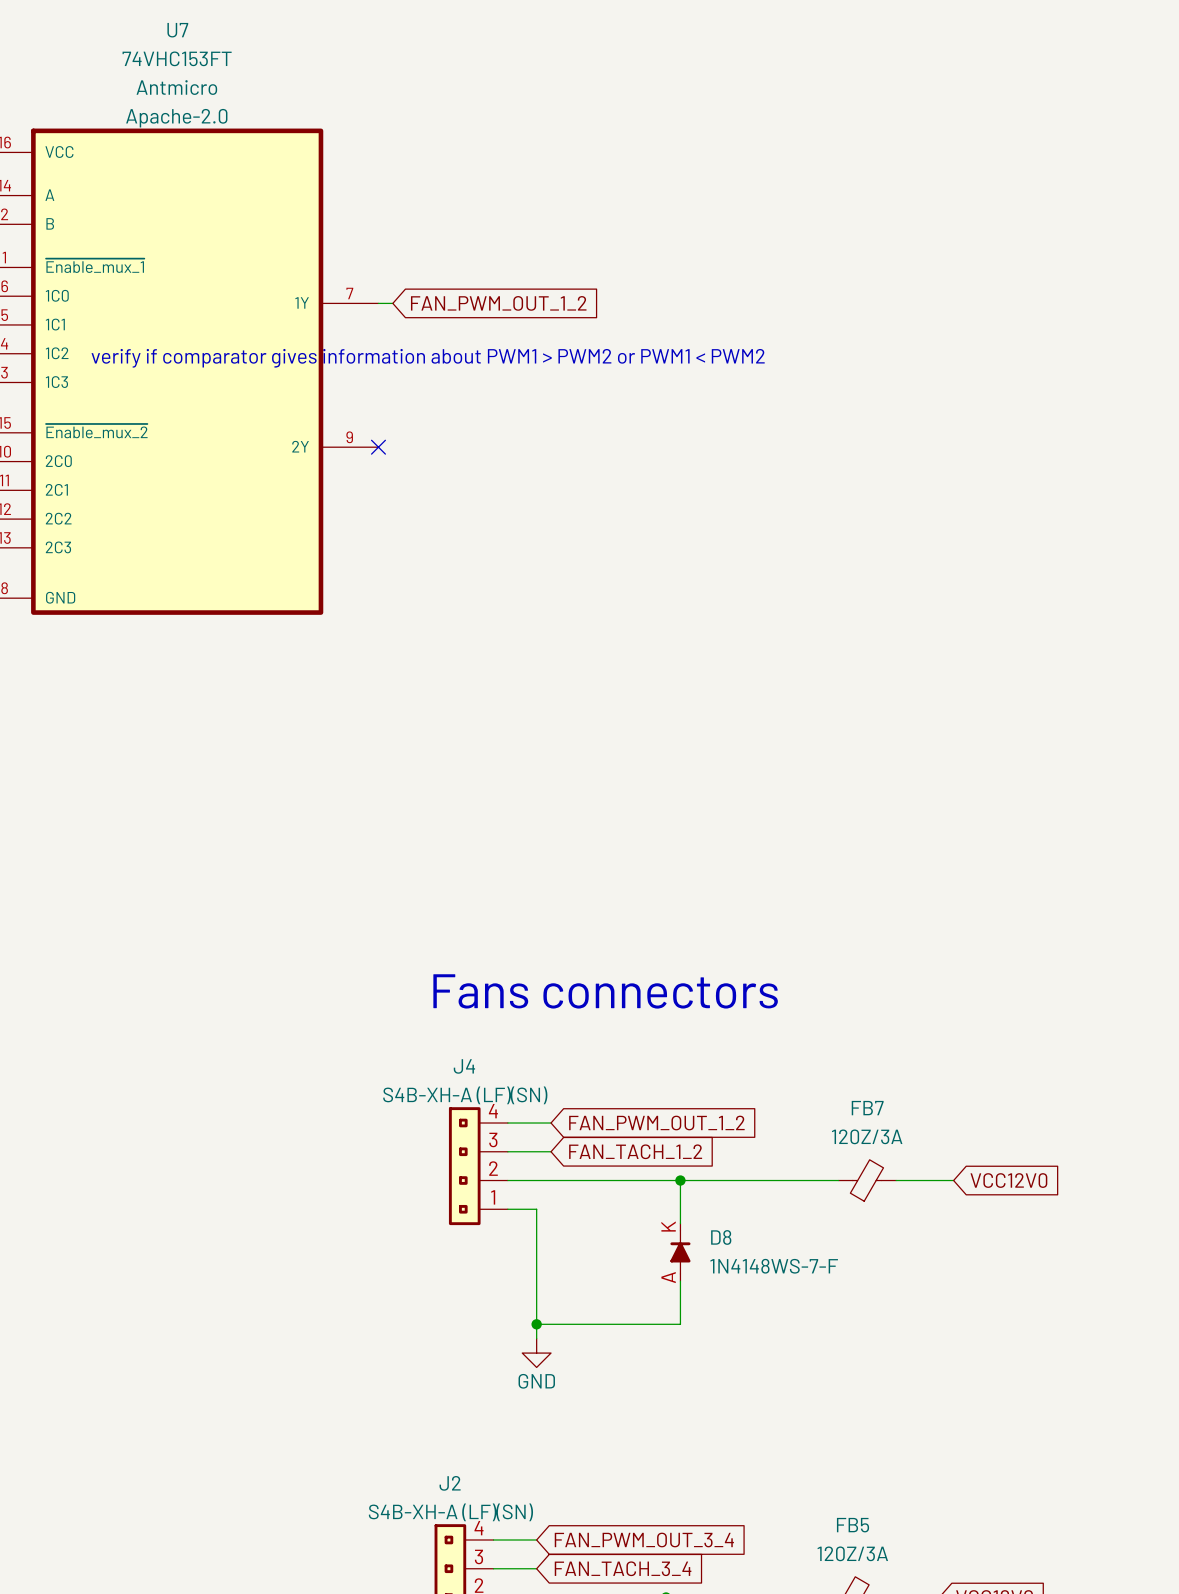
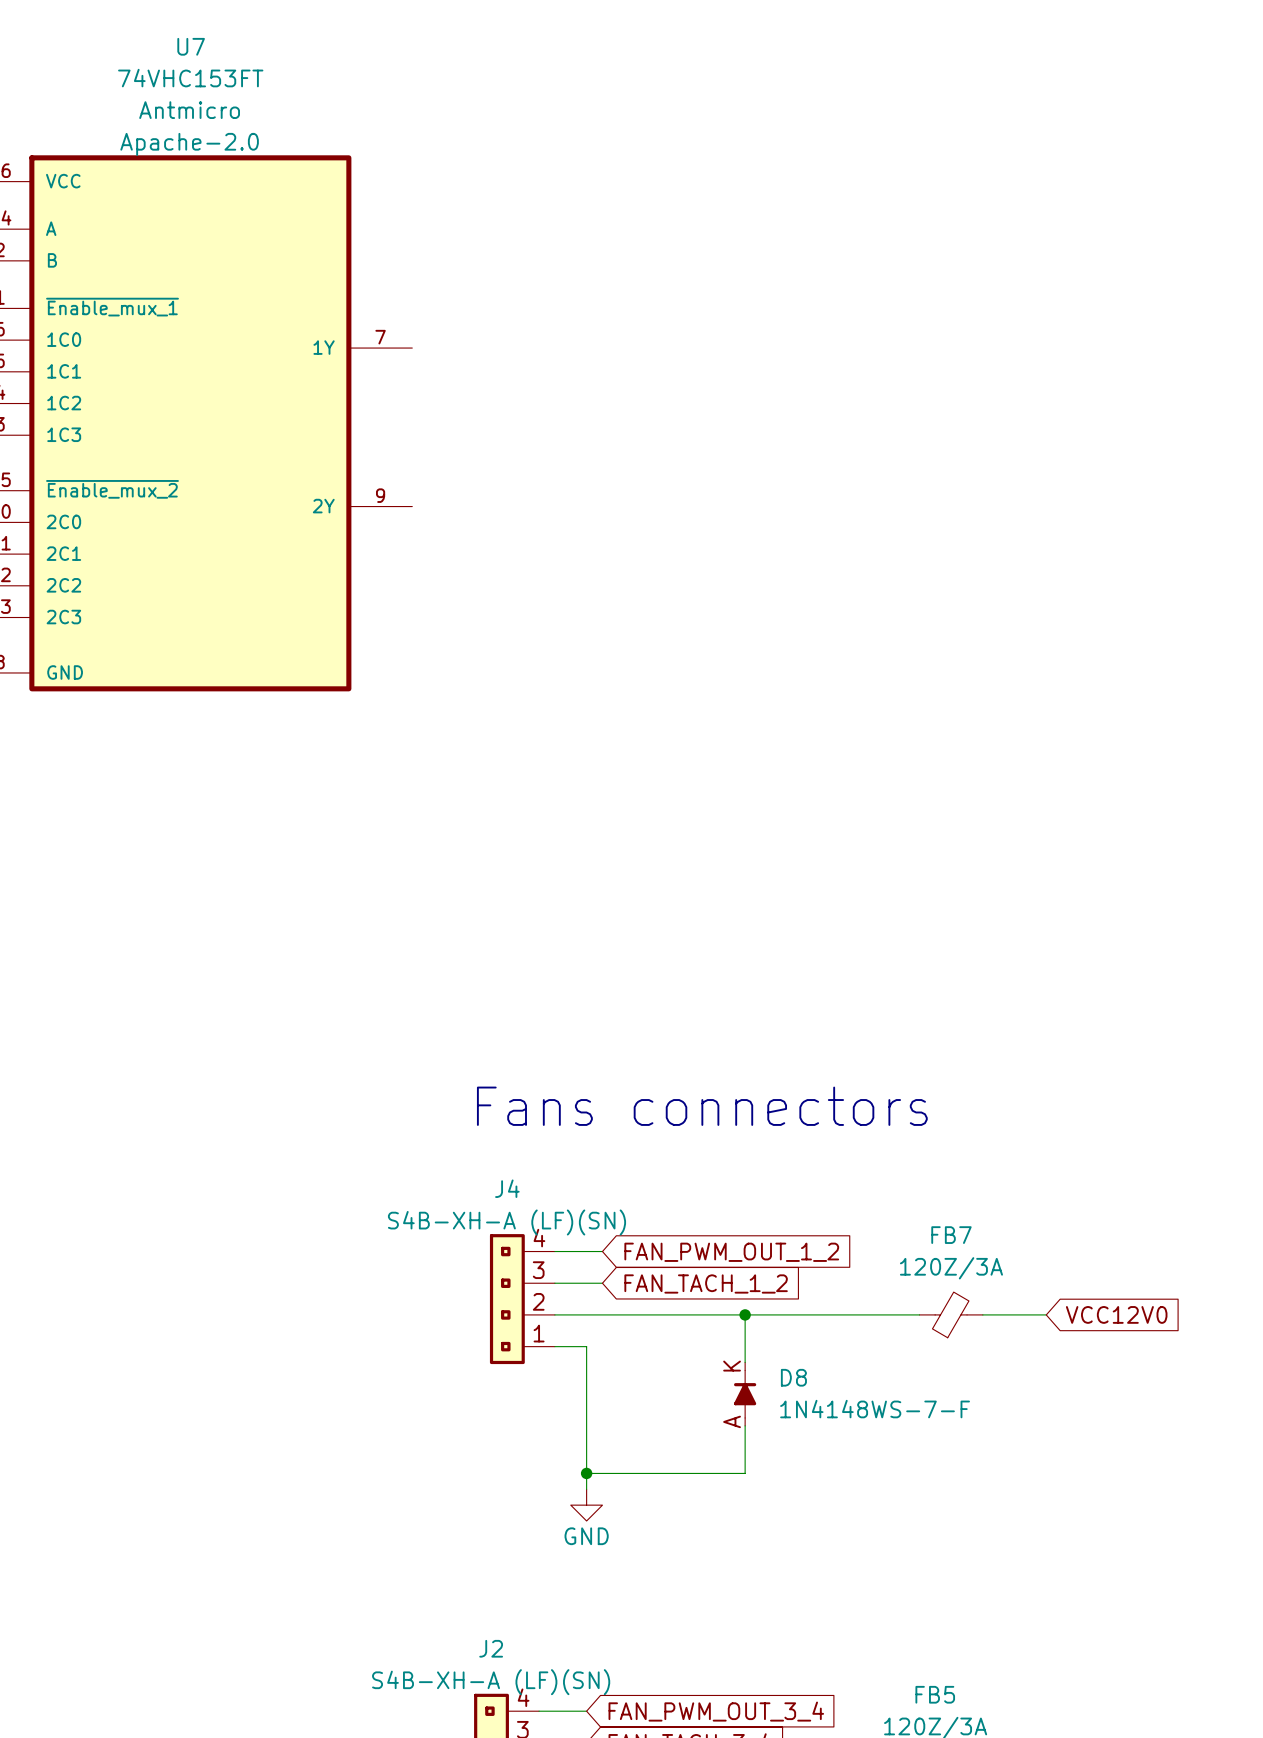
wire: (378, 303) (392, 303) -> none
global label: FAN_PWM_OUT_1_2 (498, 303) -> none
text: verify if comparator gives information about PWM1 > PWM2 or PWM1 < PWM2 (428, 358) -> none
no-connect mark: (378, 447) -> none

